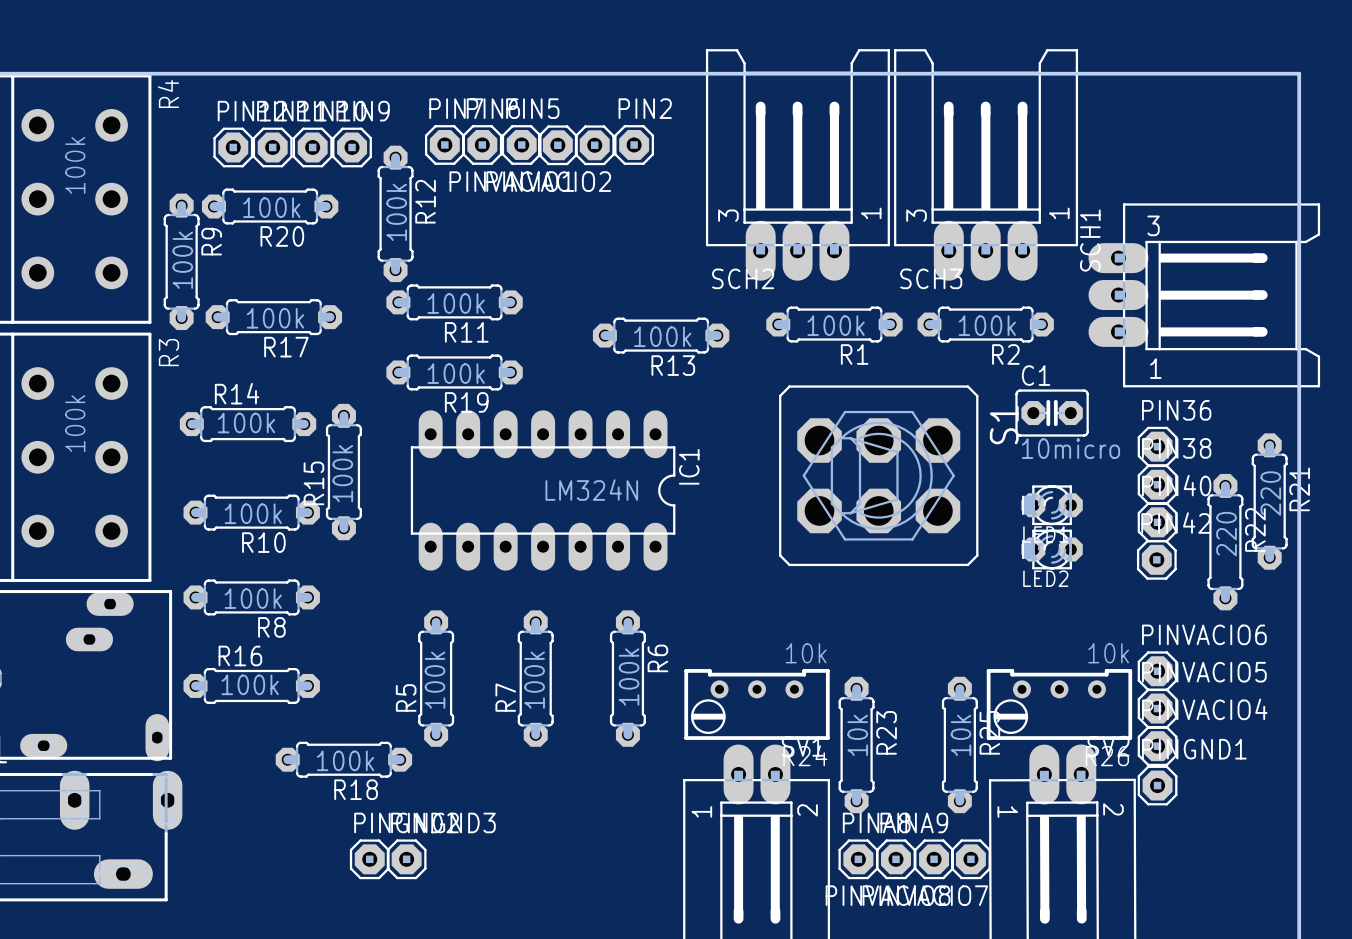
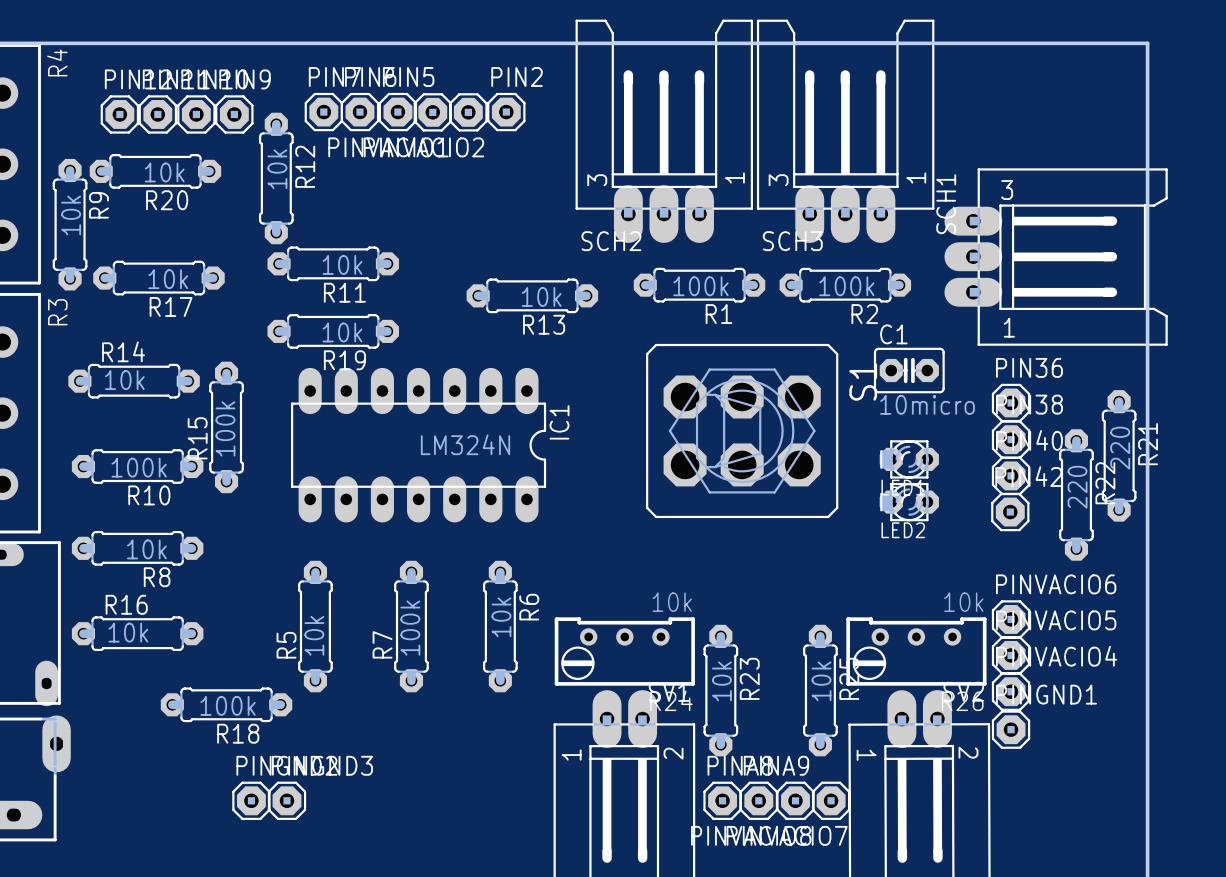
R20 value: 100k (271, 207) -> 10k (164, 172)
R12 value: 100k (396, 212) -> 10k (277, 169)
R9 value: 100k (182, 260) -> 10k (71, 215)
R11 value: 100k (456, 303) -> 10k (342, 264)
R17 value: 100k (275, 318) -> 10k (168, 279)
R13 value: 100k (662, 336) -> 10k (541, 296)
R19 value: 100k (456, 373) -> 10k (342, 332)
R14 value: 100k (246, 422) -> 10k (124, 380)
R8 value: 100k (253, 598) -> 10k (146, 549)
R6 value: 100k (629, 677) -> 10k (501, 617)
R5 value: 100k (435, 680) -> 10k (314, 635)
R16 value: 100k (250, 684) -> 10k (128, 632)

